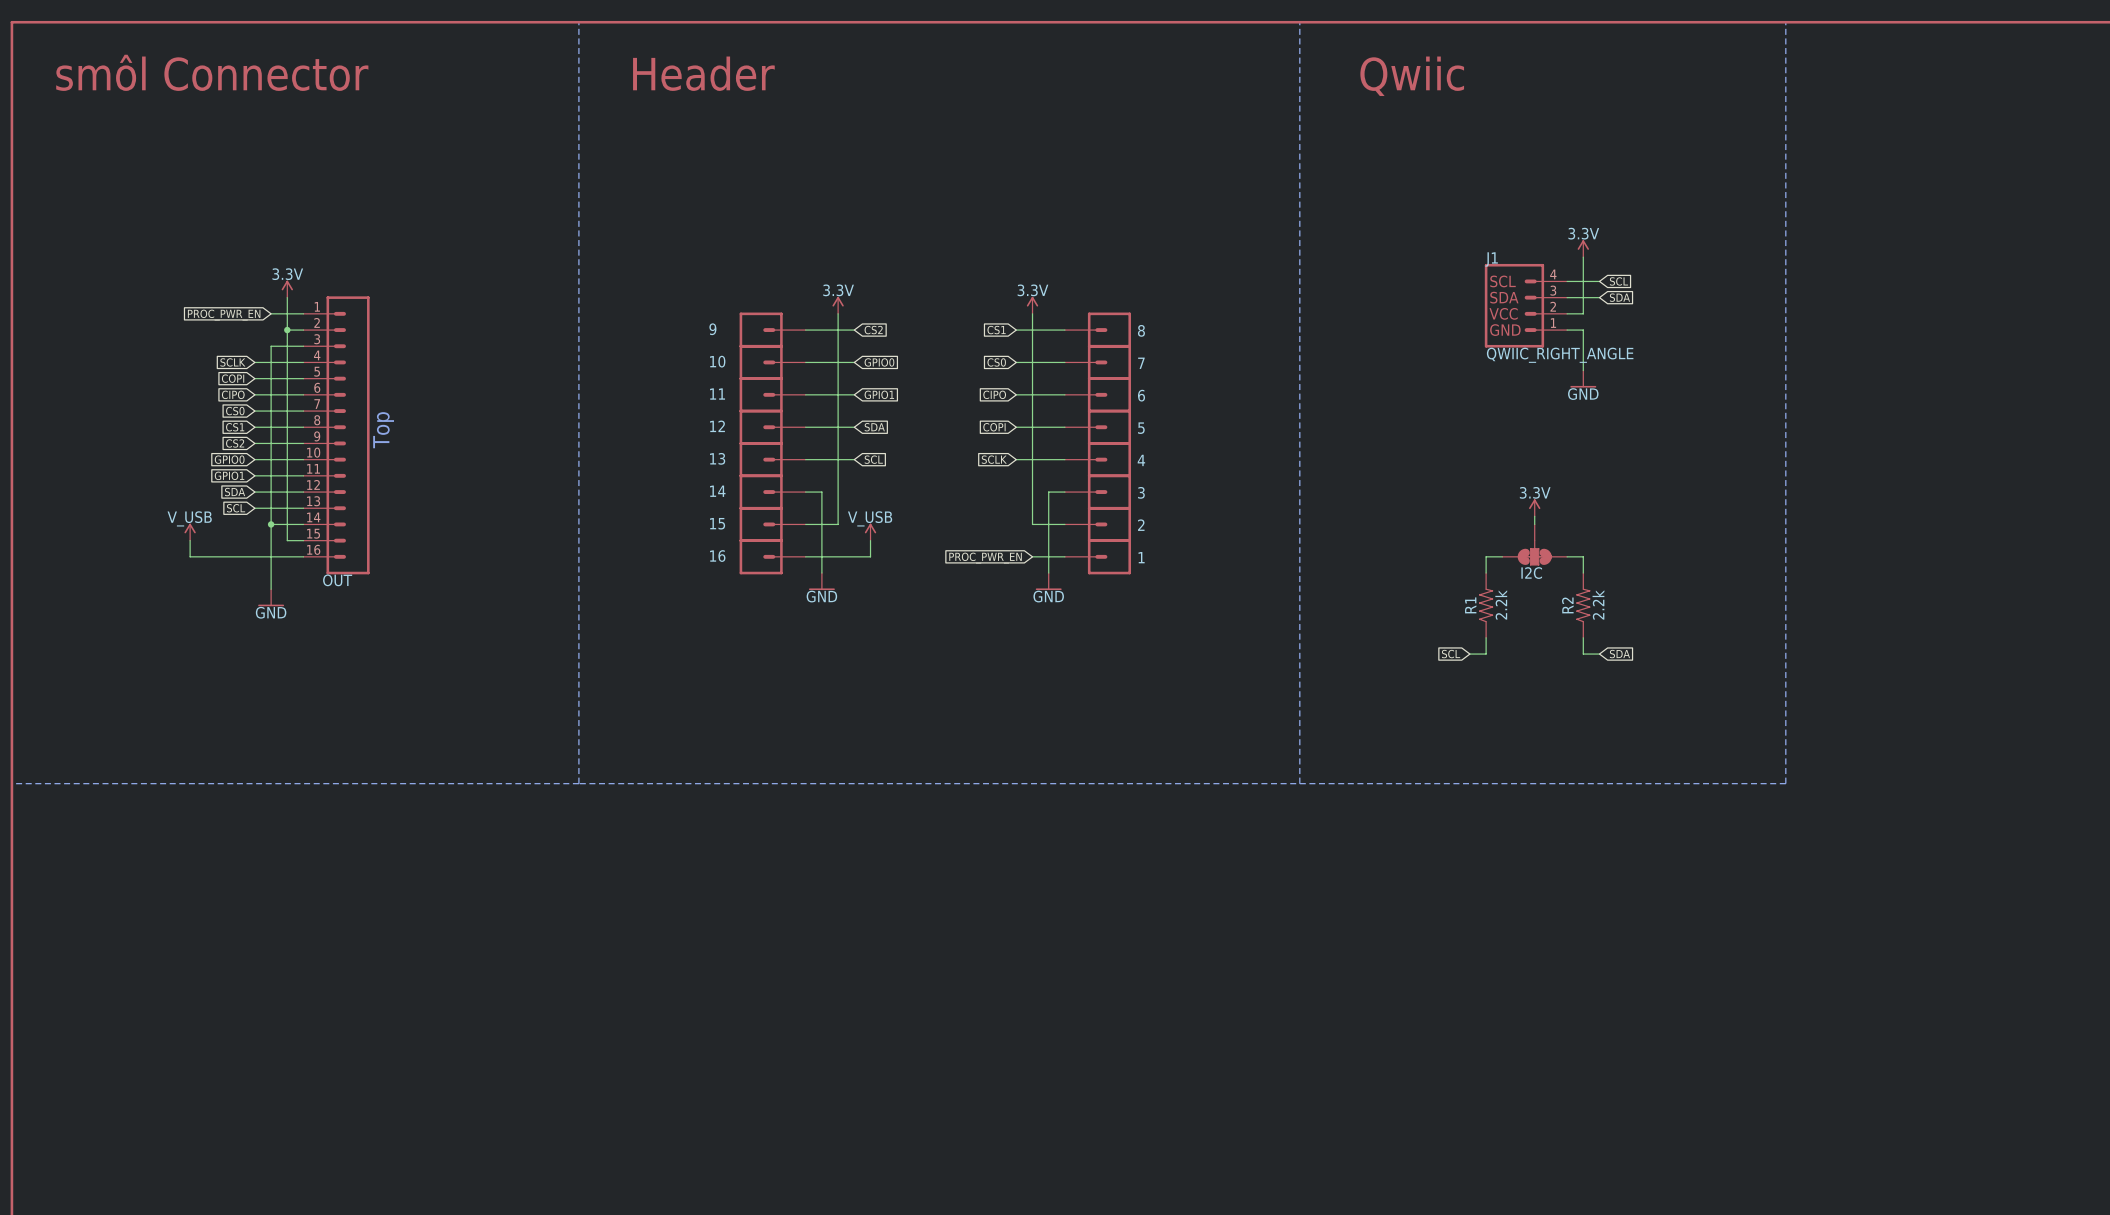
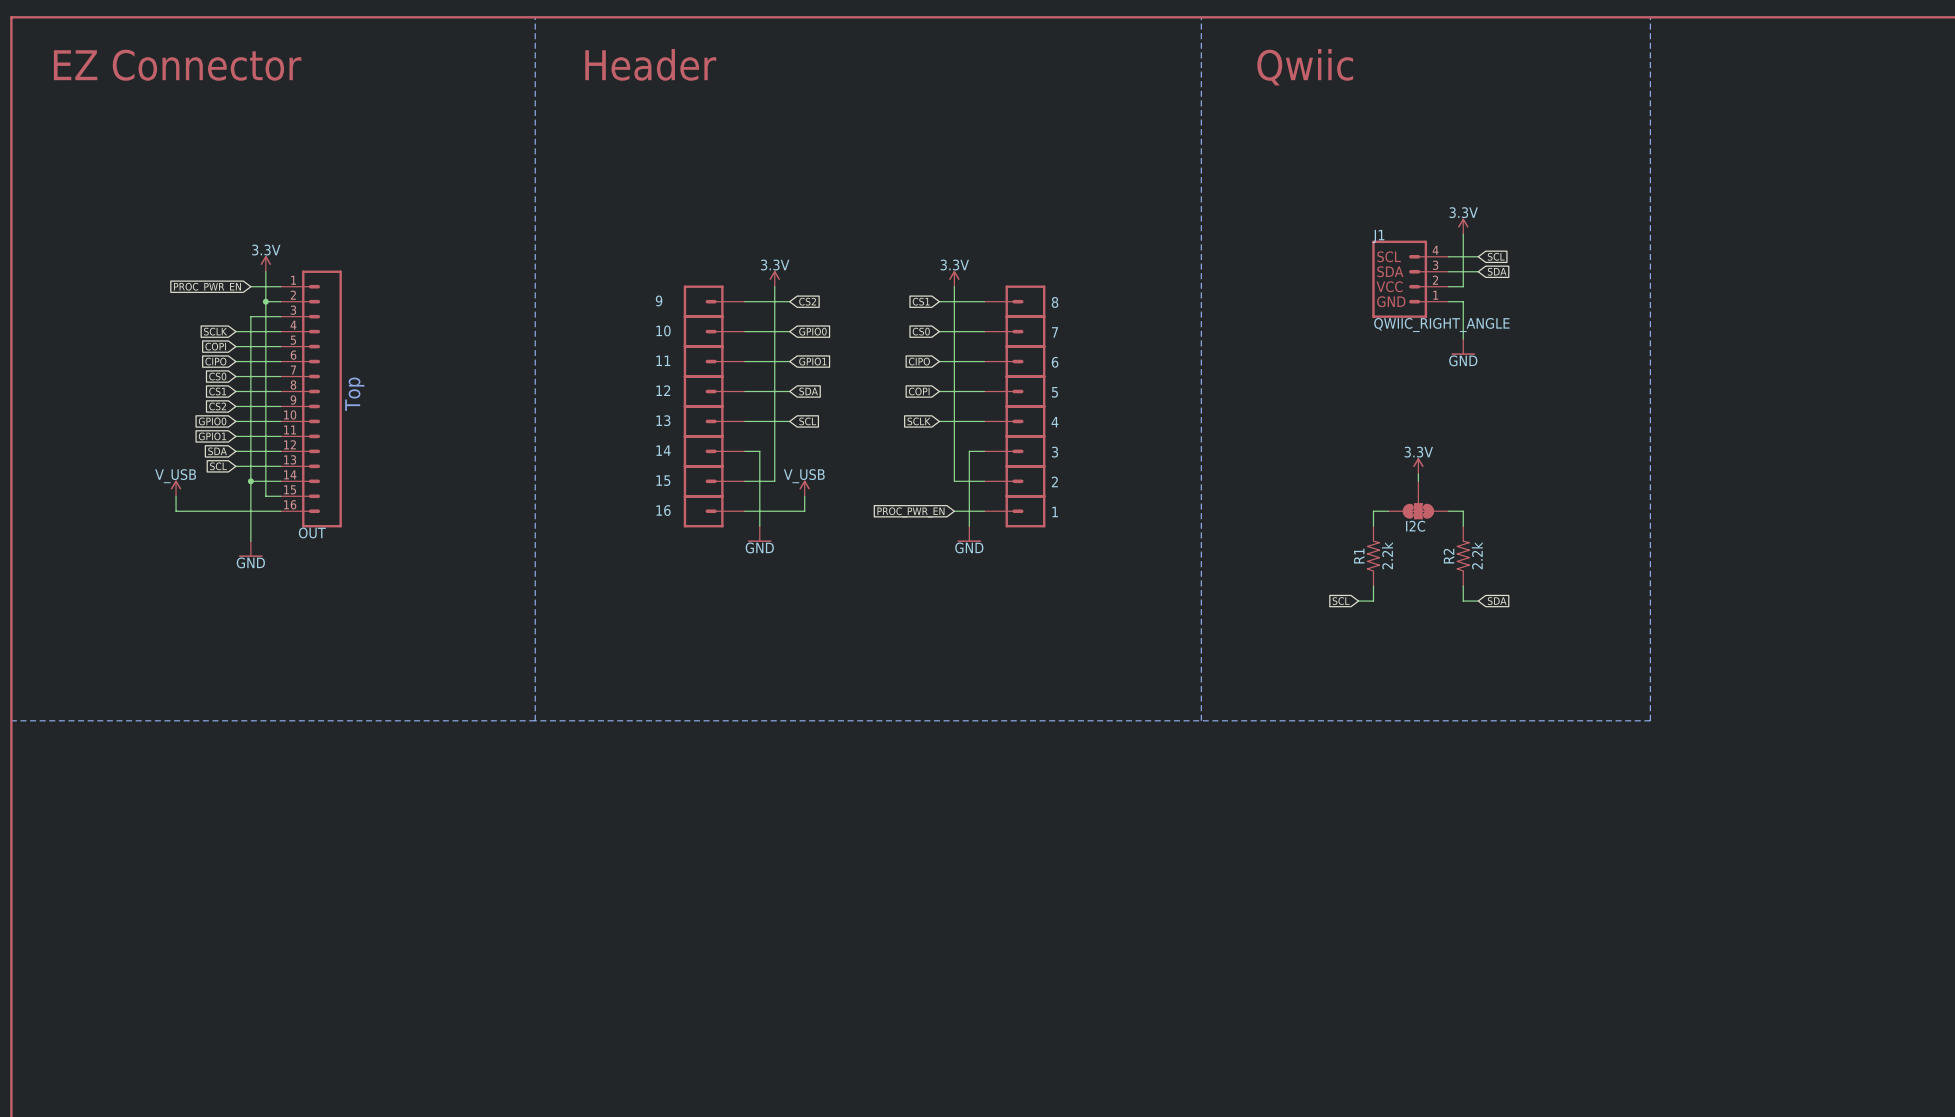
text: smôl Connector (212, 72) -> EZ Connector (177, 65)

